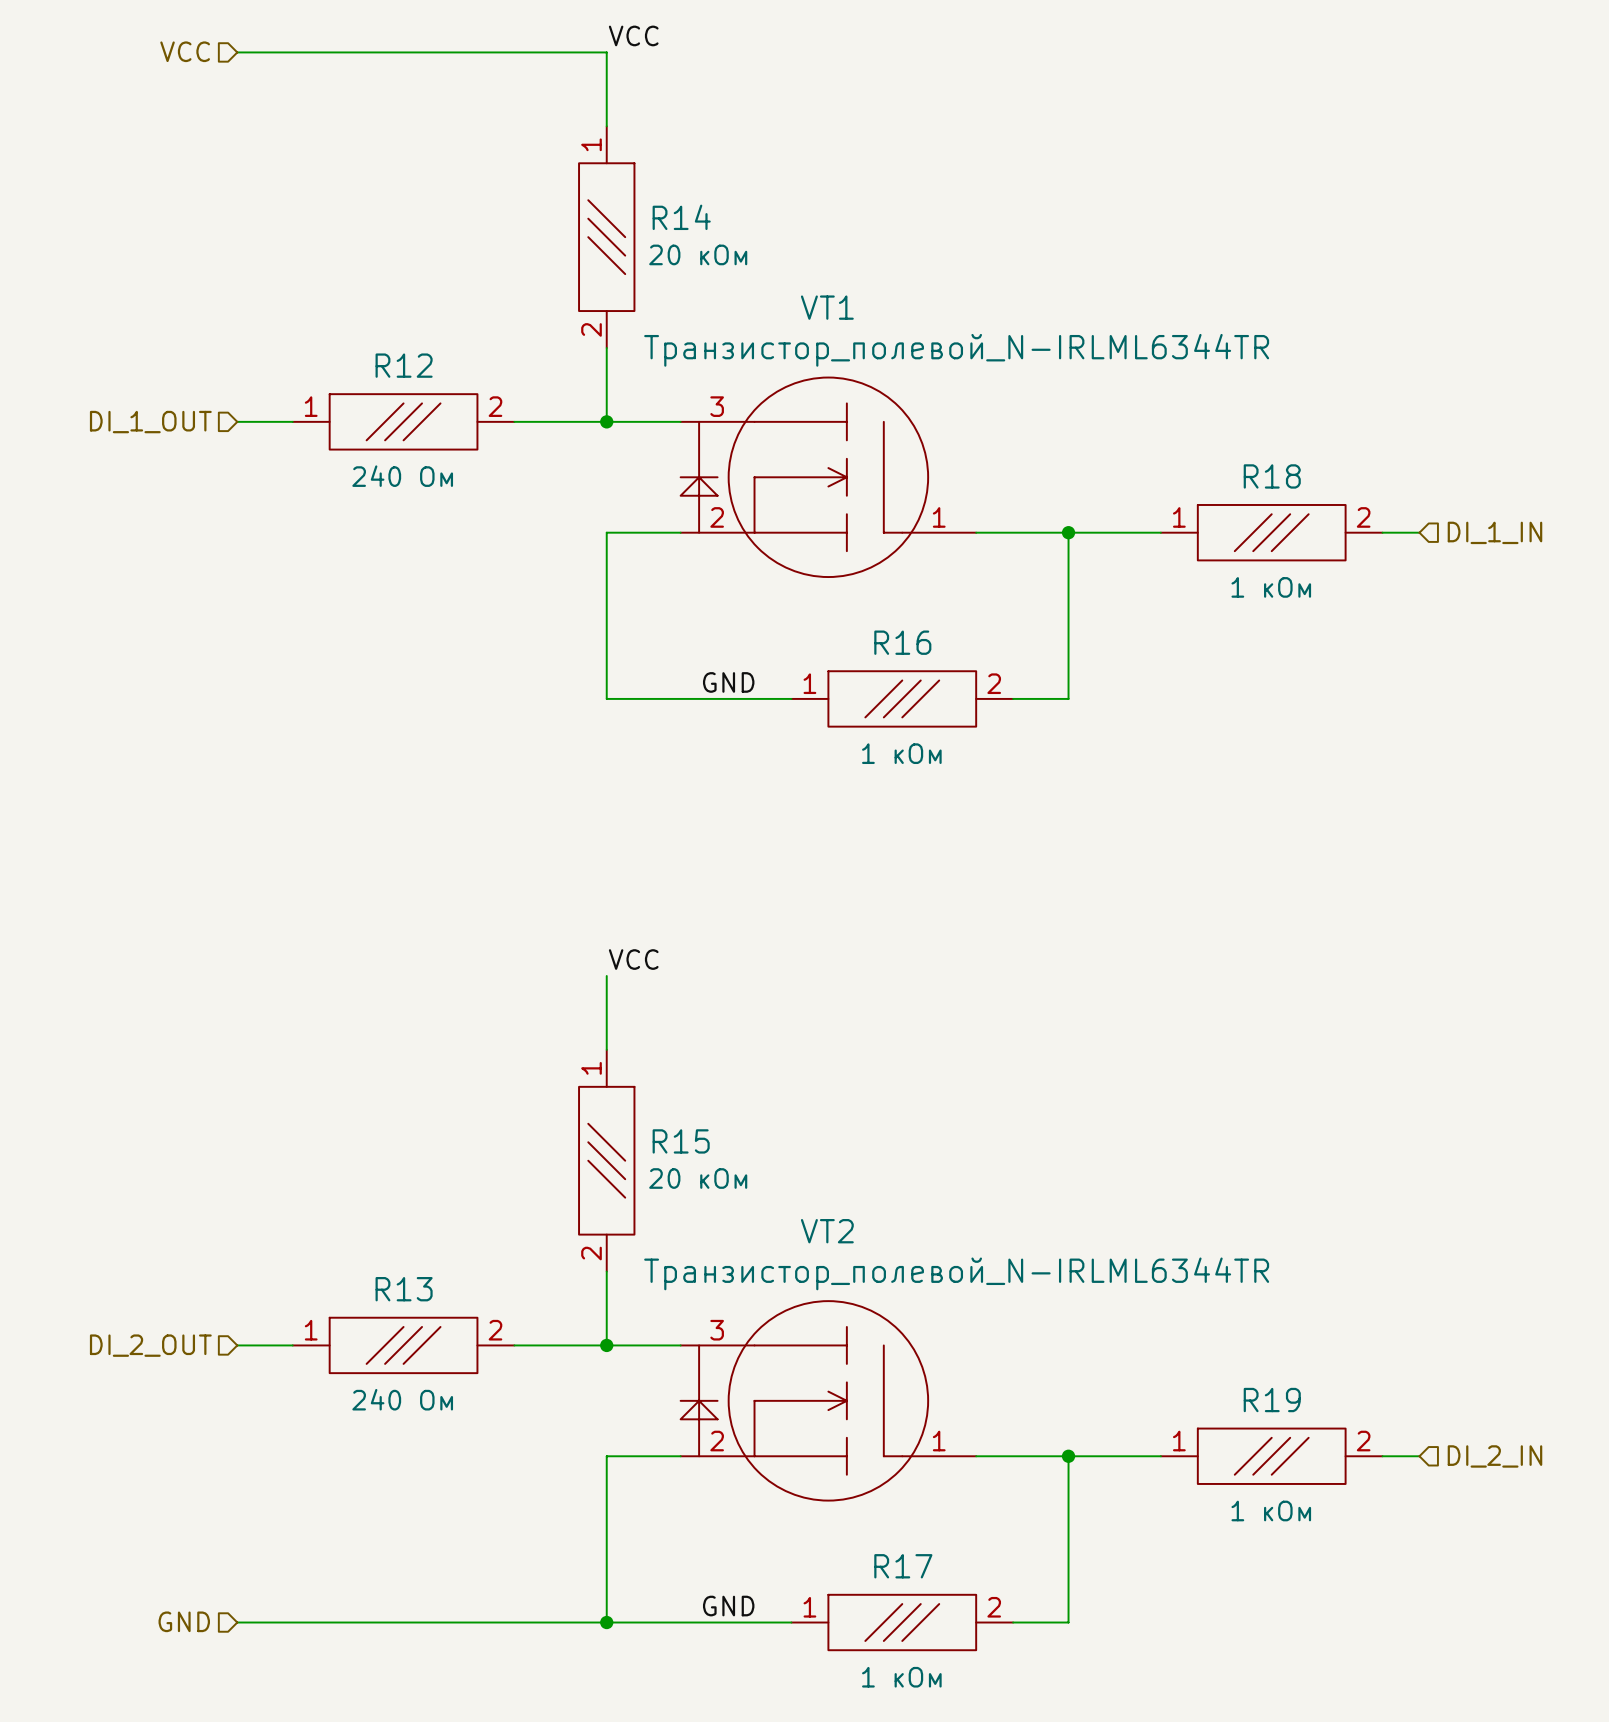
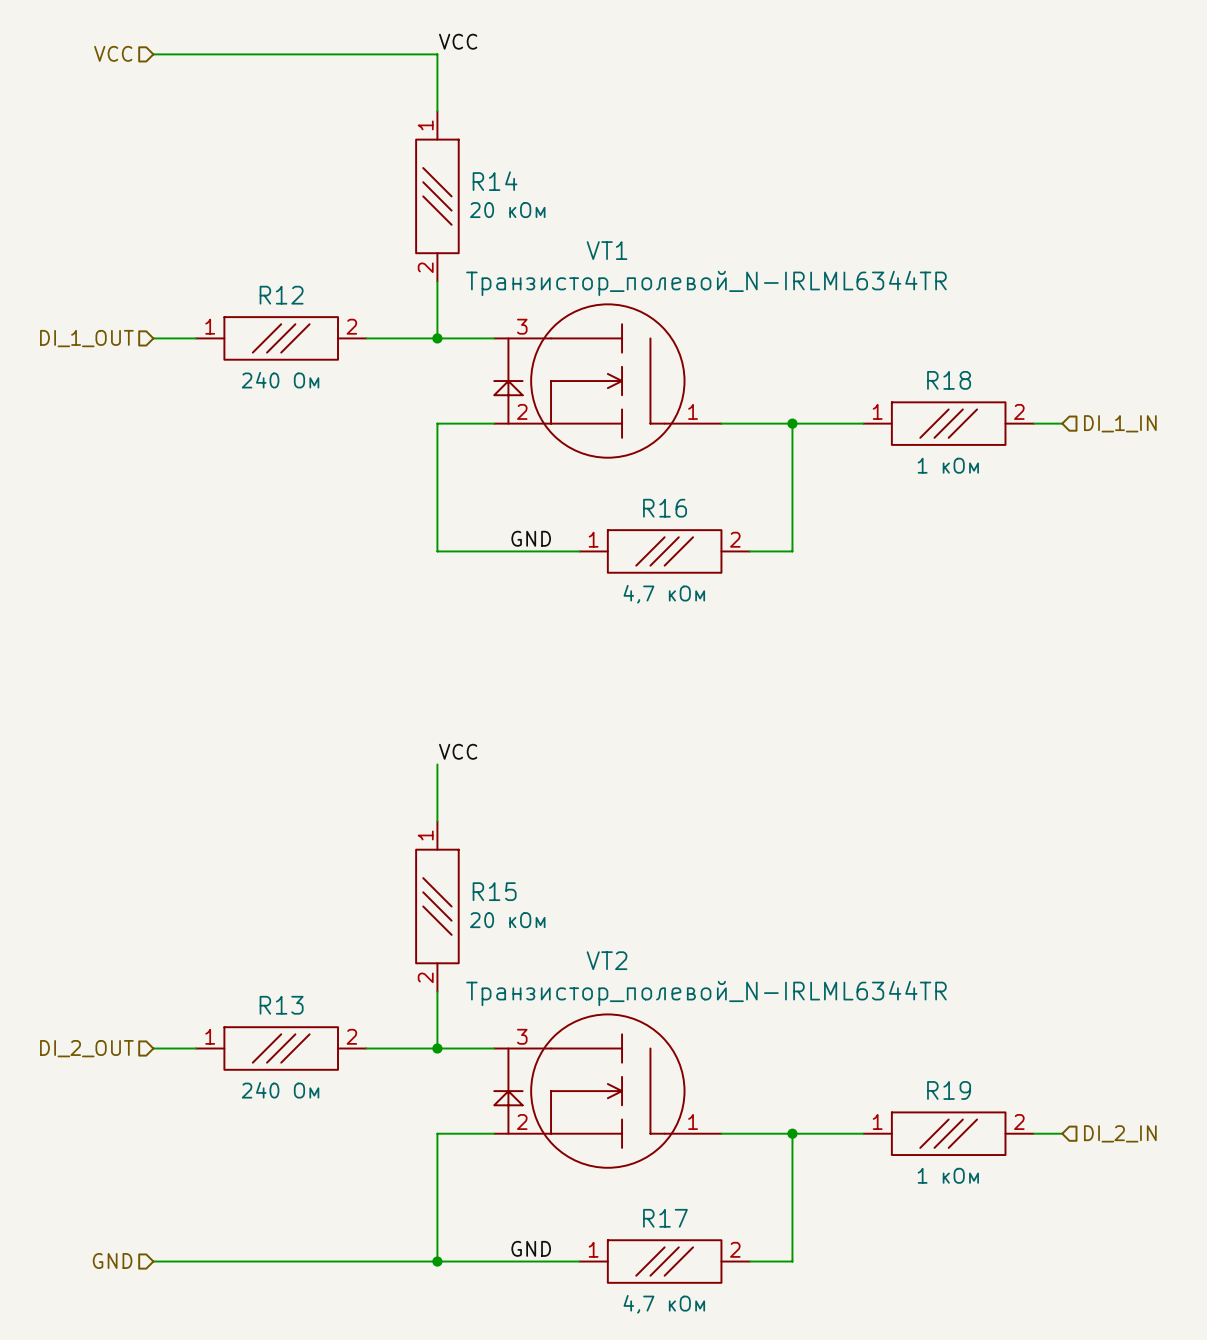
R16 text: 1 кОм (901, 753) -> 4,7 кОм (664, 594)
R17 text: 1 кОм (901, 1677) -> 4,7 кОм (664, 1304)

